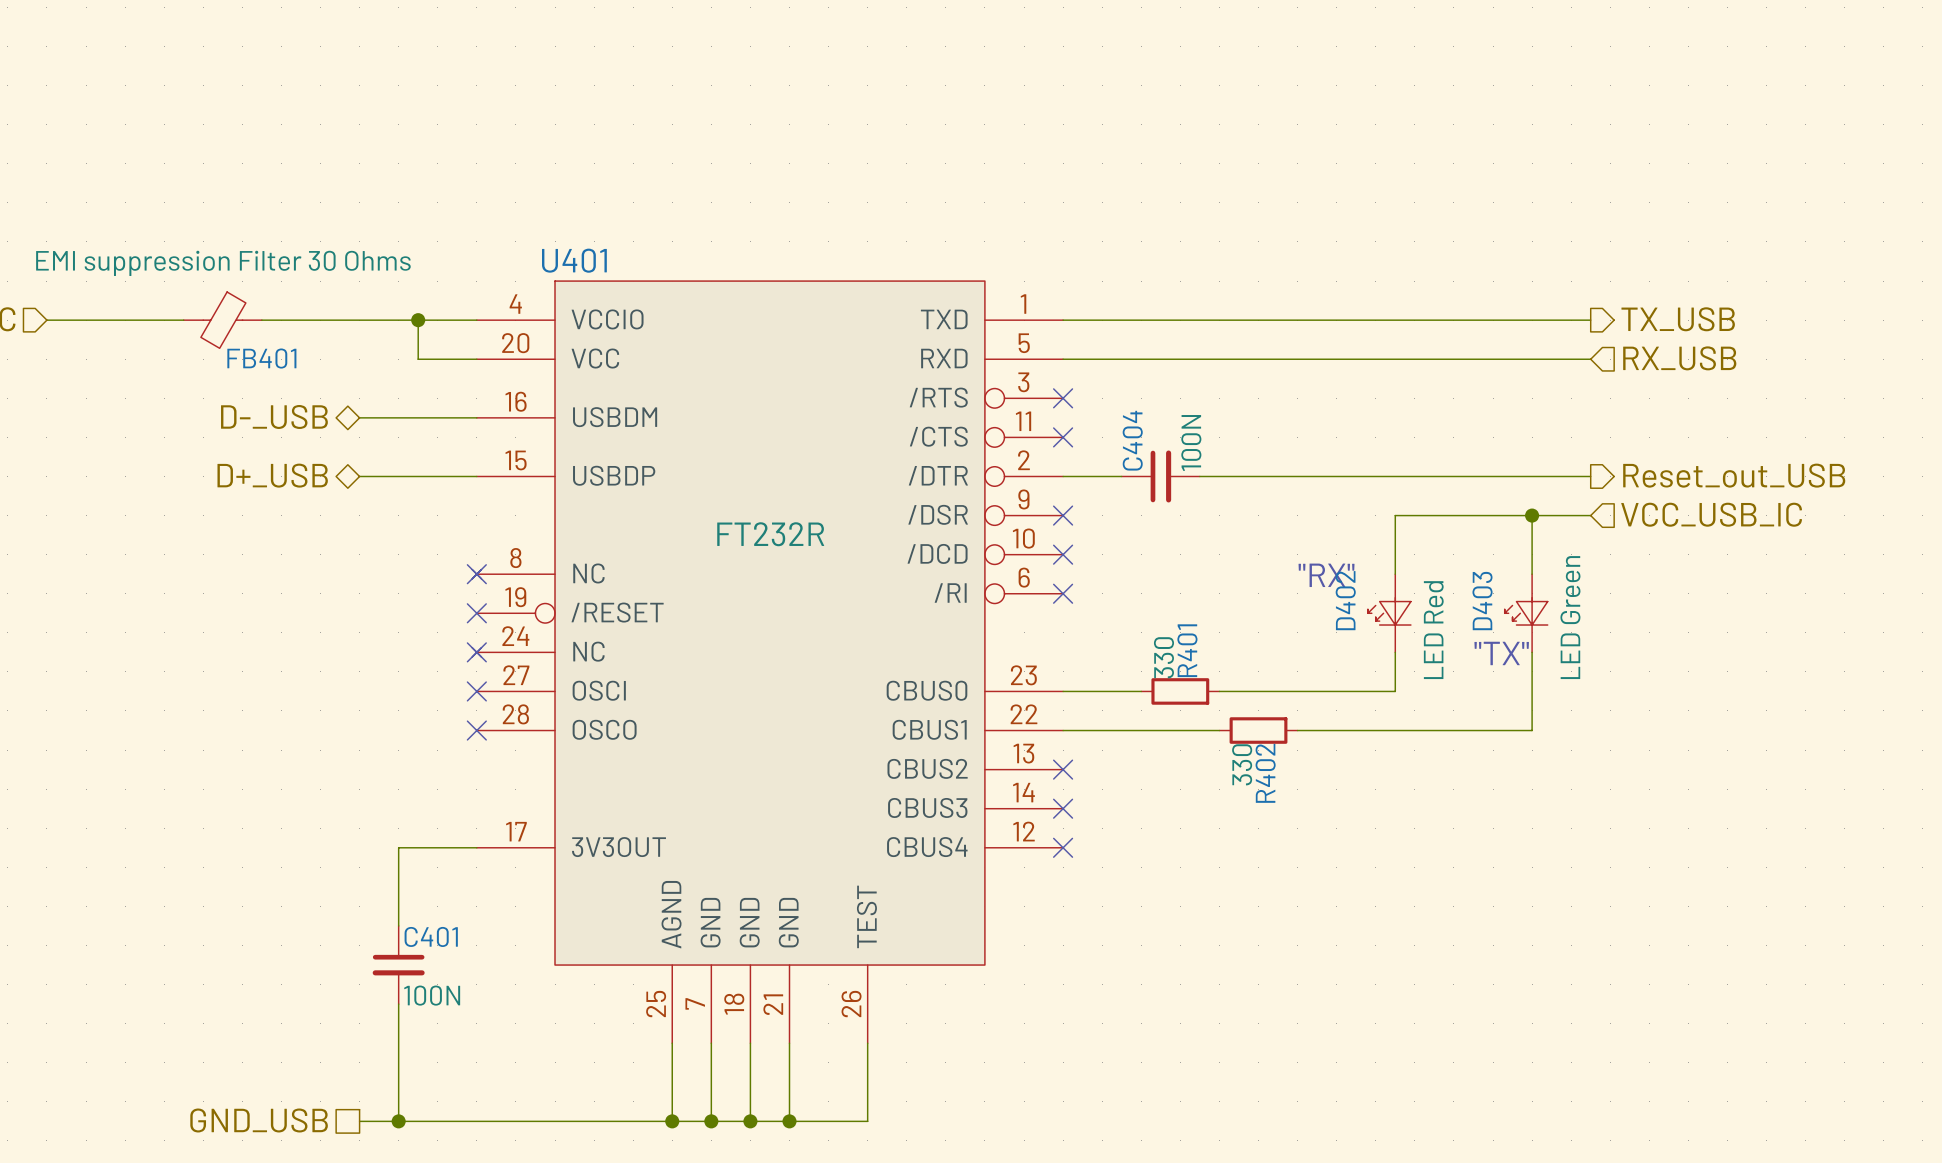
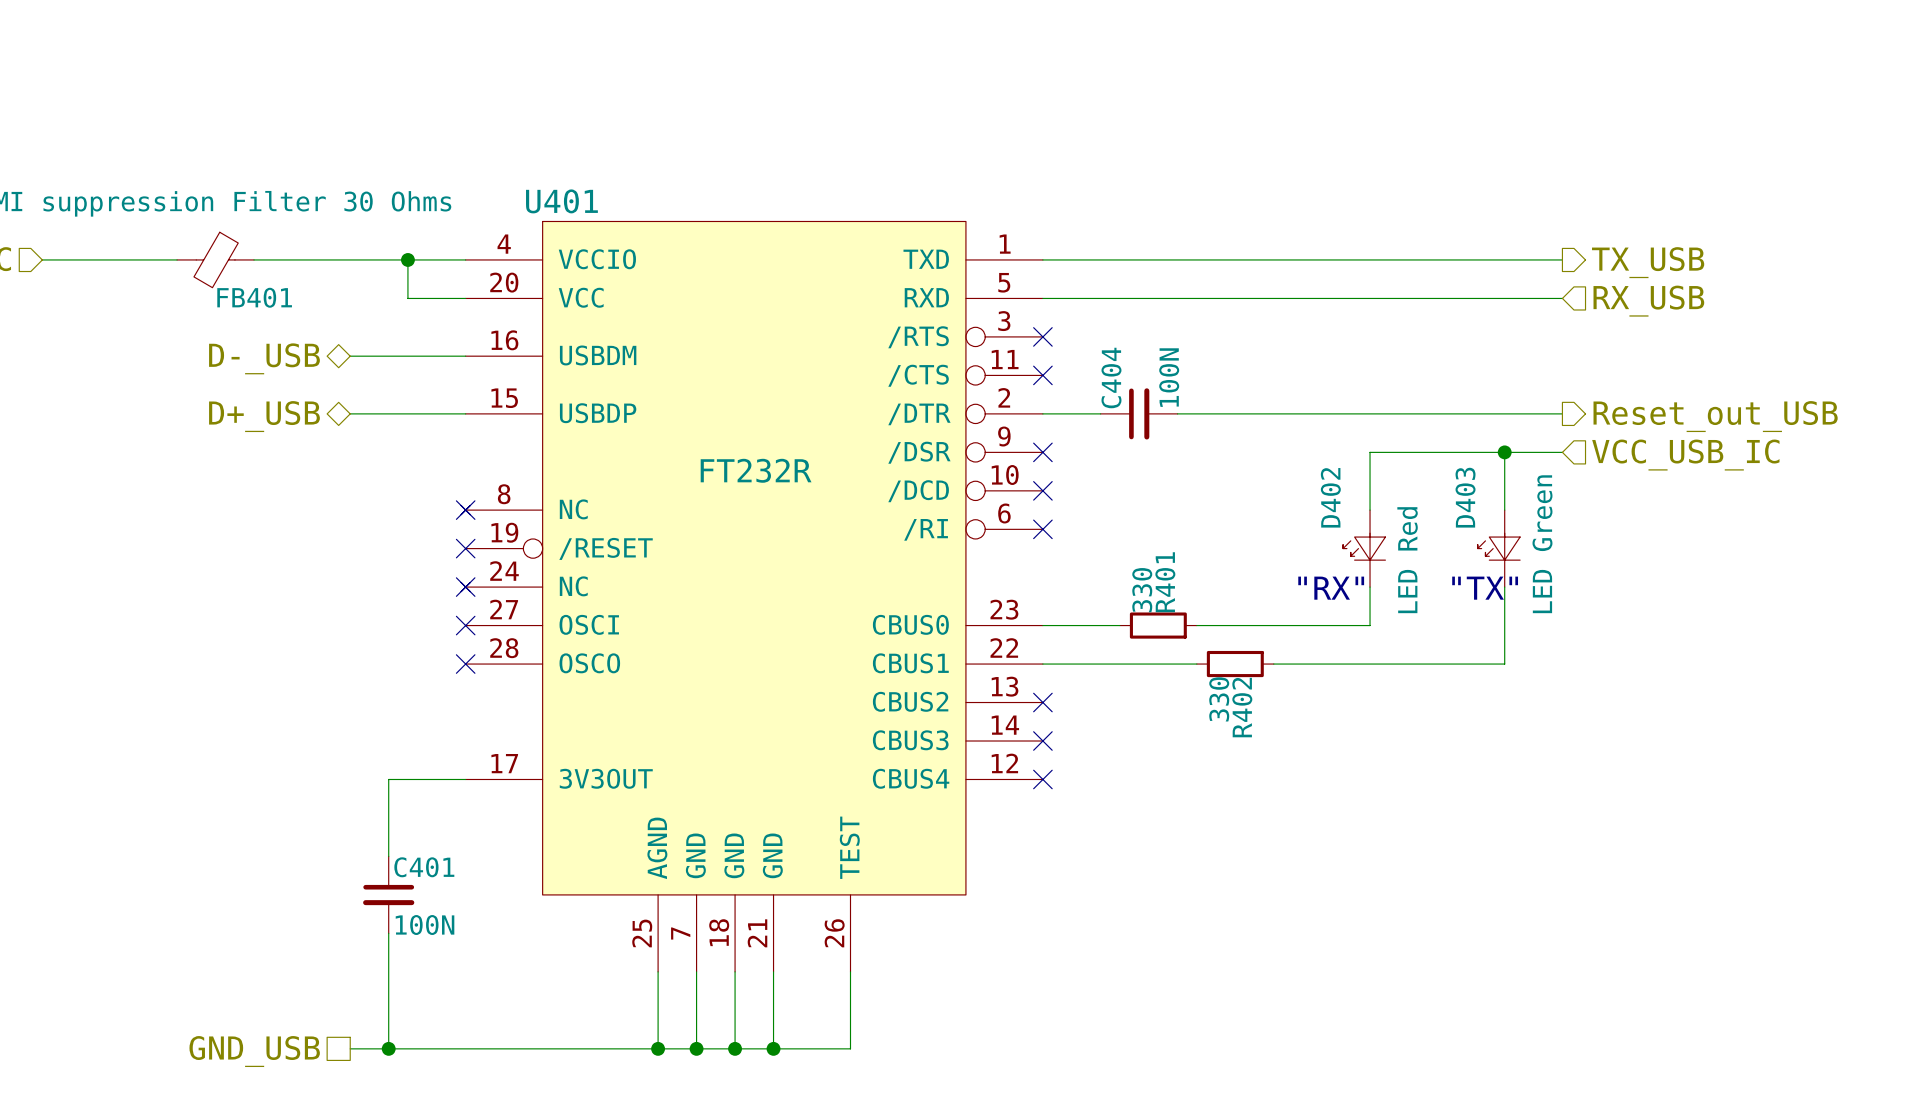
text position: "RX" (1326, 575) -> "RX" (1331, 588)
D402 name position: D402 (1345, 600) -> D402 (1330, 497)
D403 name position: D403 (1482, 601) -> D403 (1465, 497)

